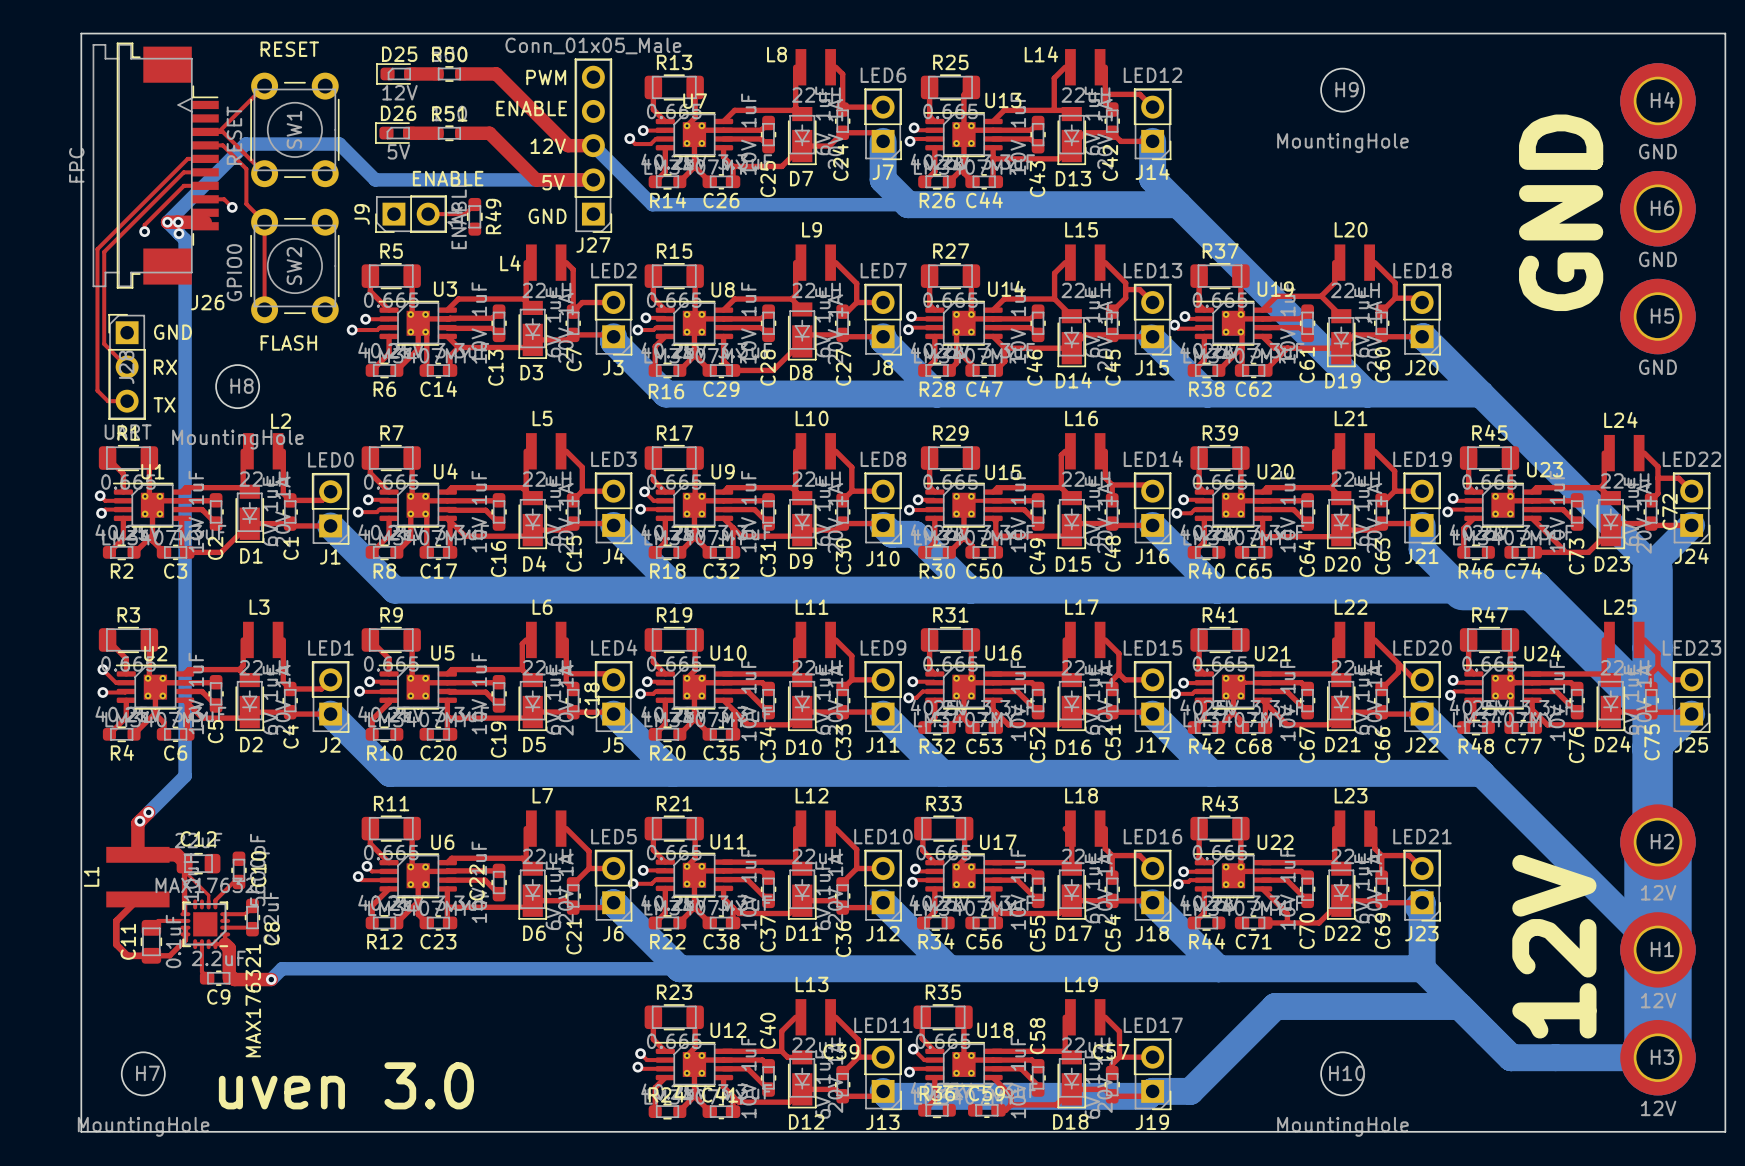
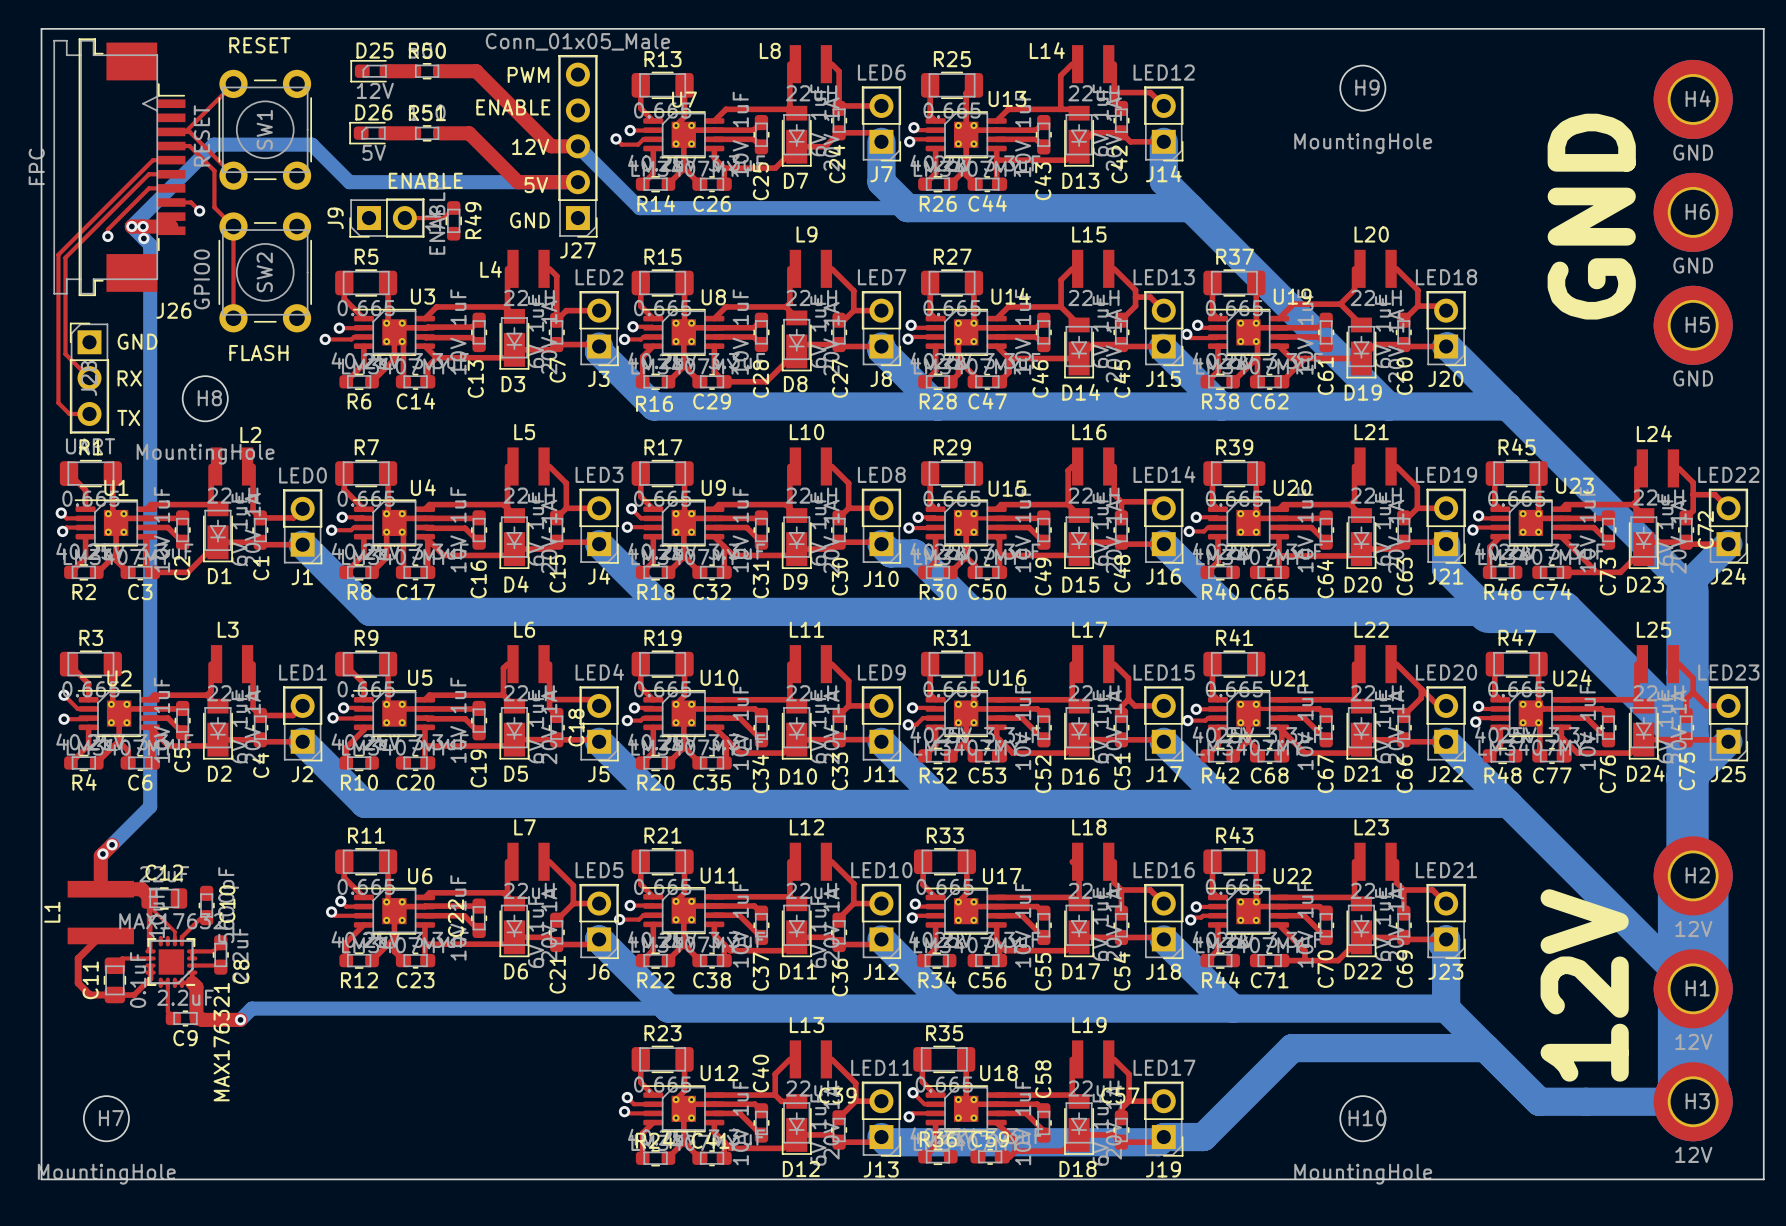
text: uven 3.0 (346, 1085) -> none

